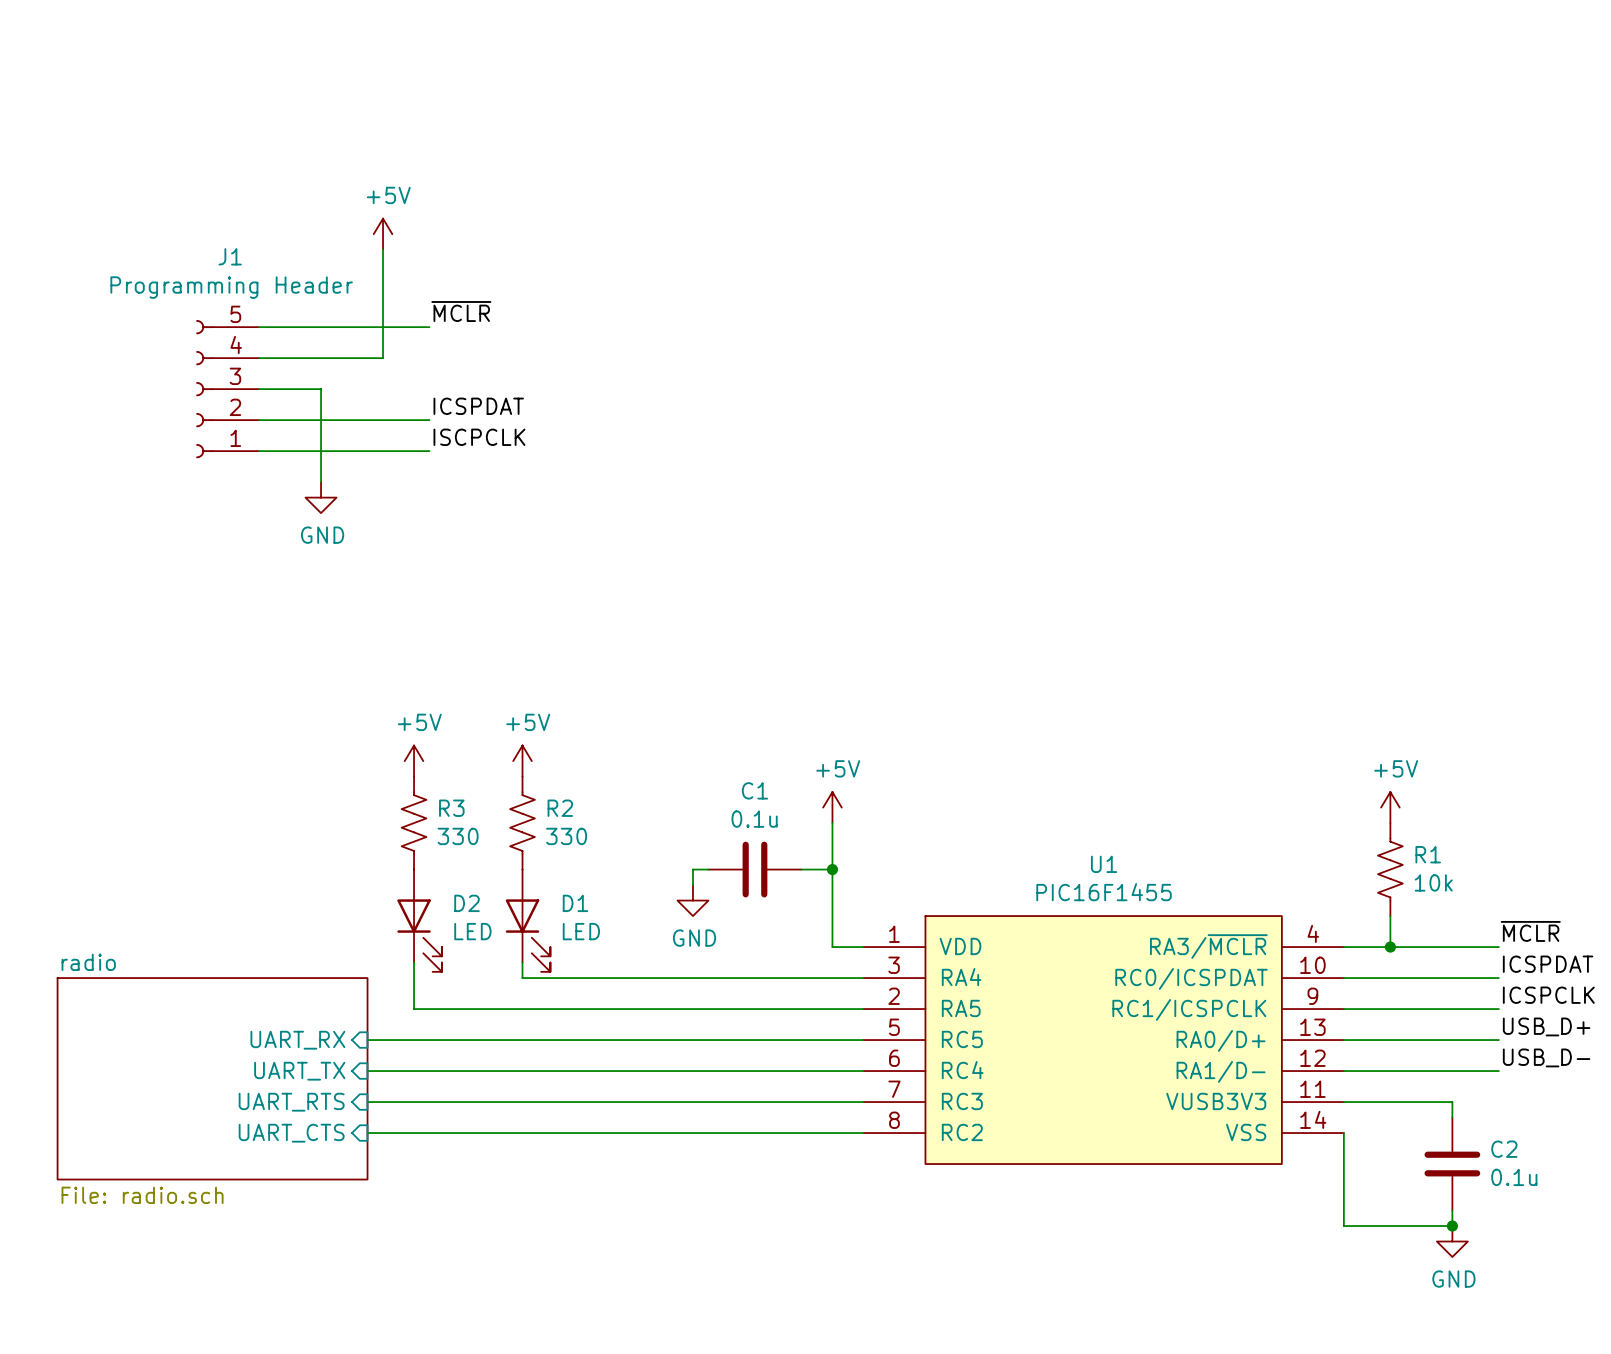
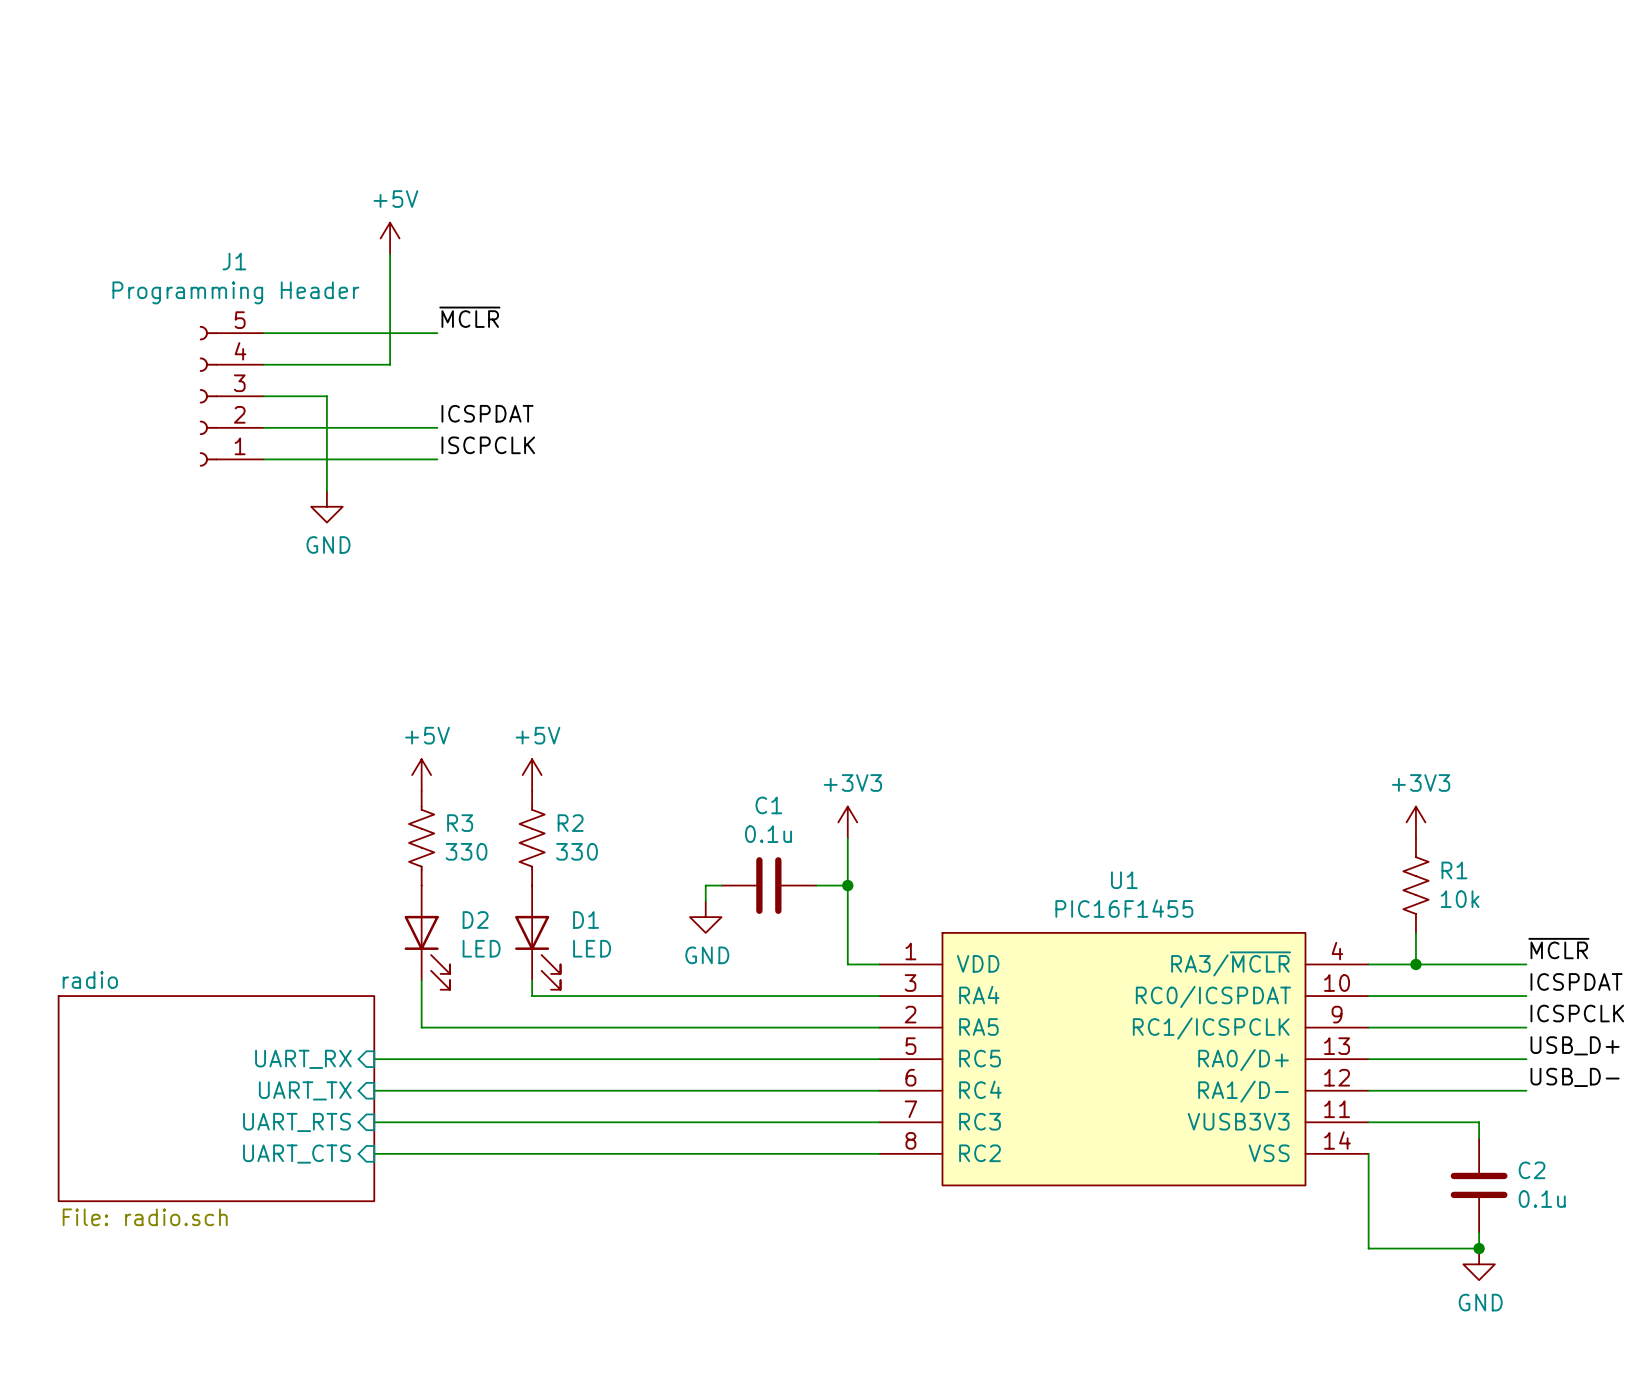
power symbol: +5V (832, 807) -> +3V3 (847, 822)
power symbol: +5V (1390, 807) -> +3V3 (1415, 822)

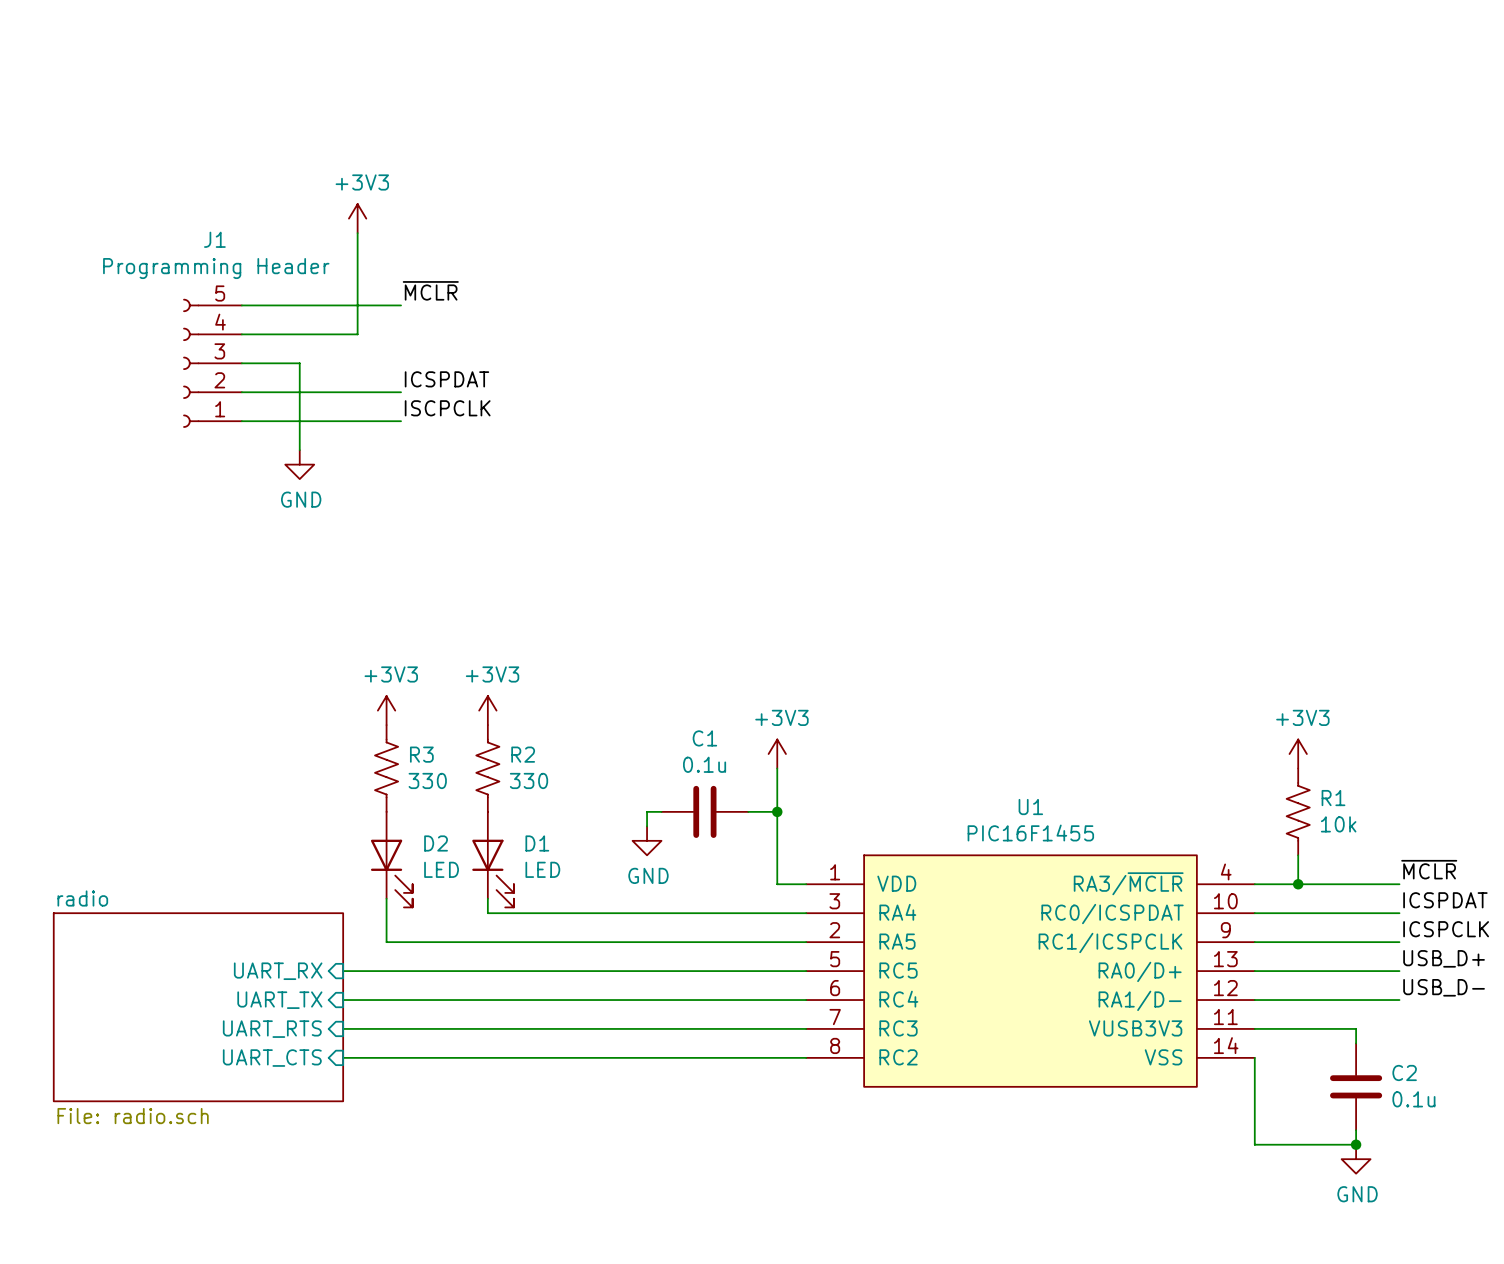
power symbol: +5V (390, 238) -> +3V3 (357, 218)
power symbol: +5V (421, 775) -> +3V3 (386, 710)
power symbol: +5V (532, 775) -> +3V3 (487, 710)

